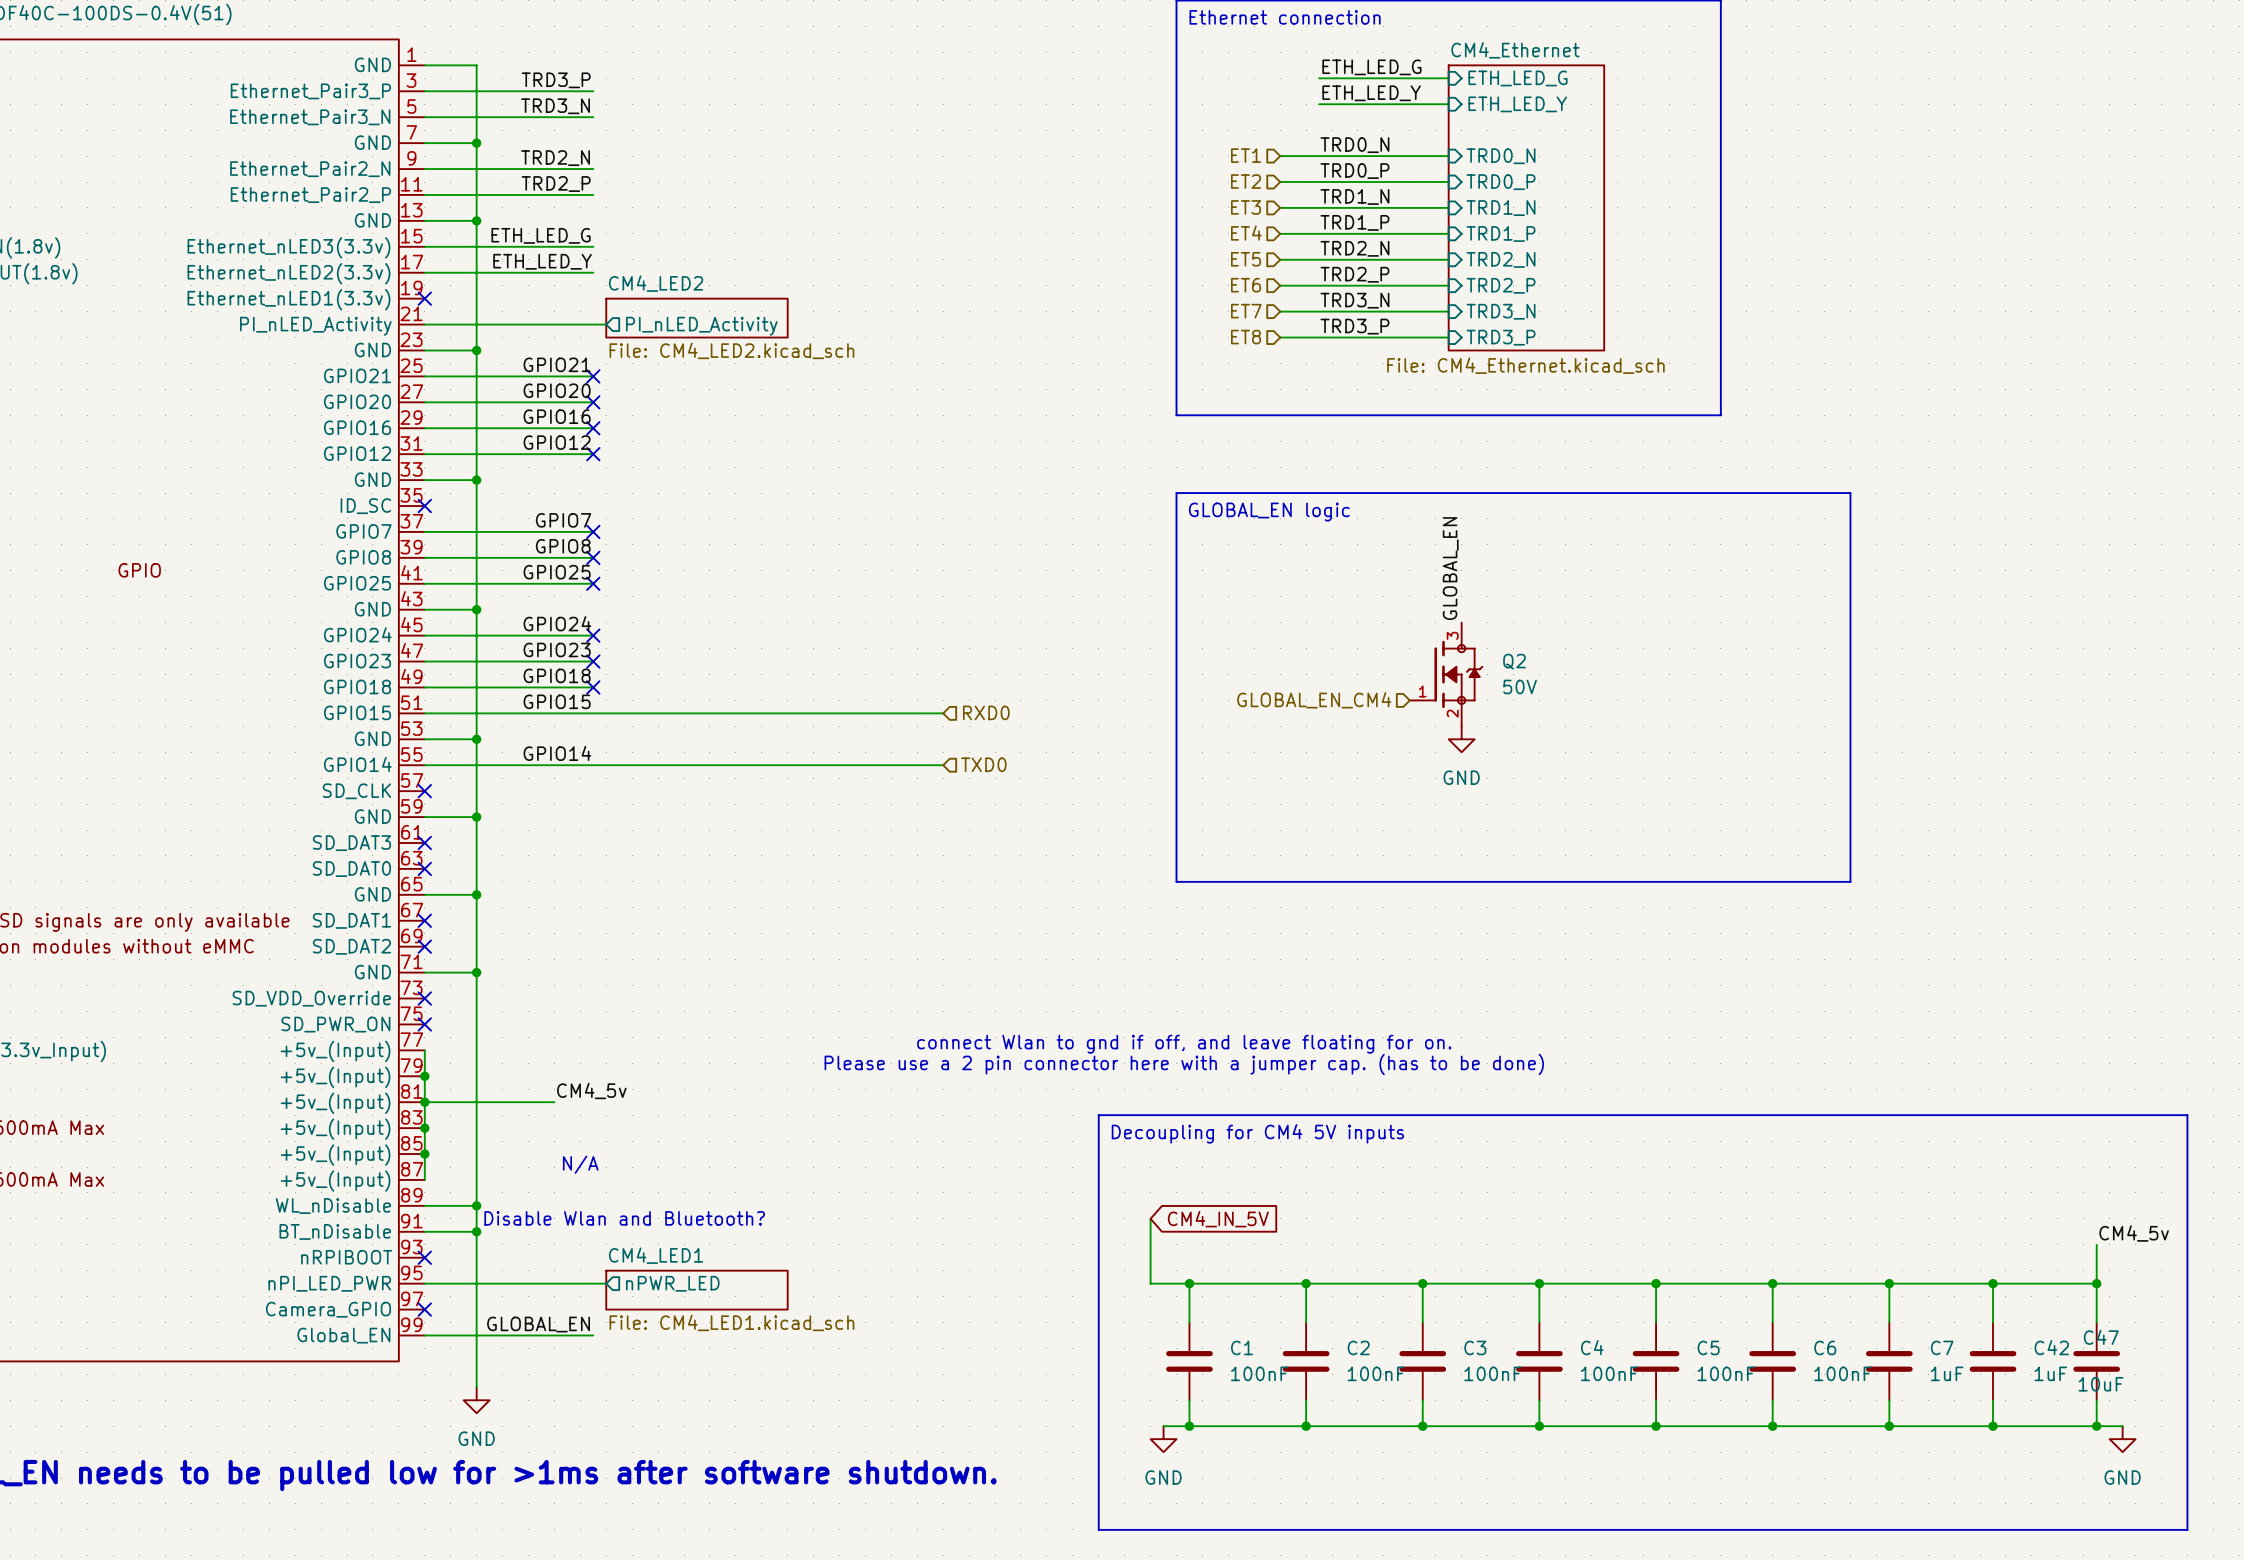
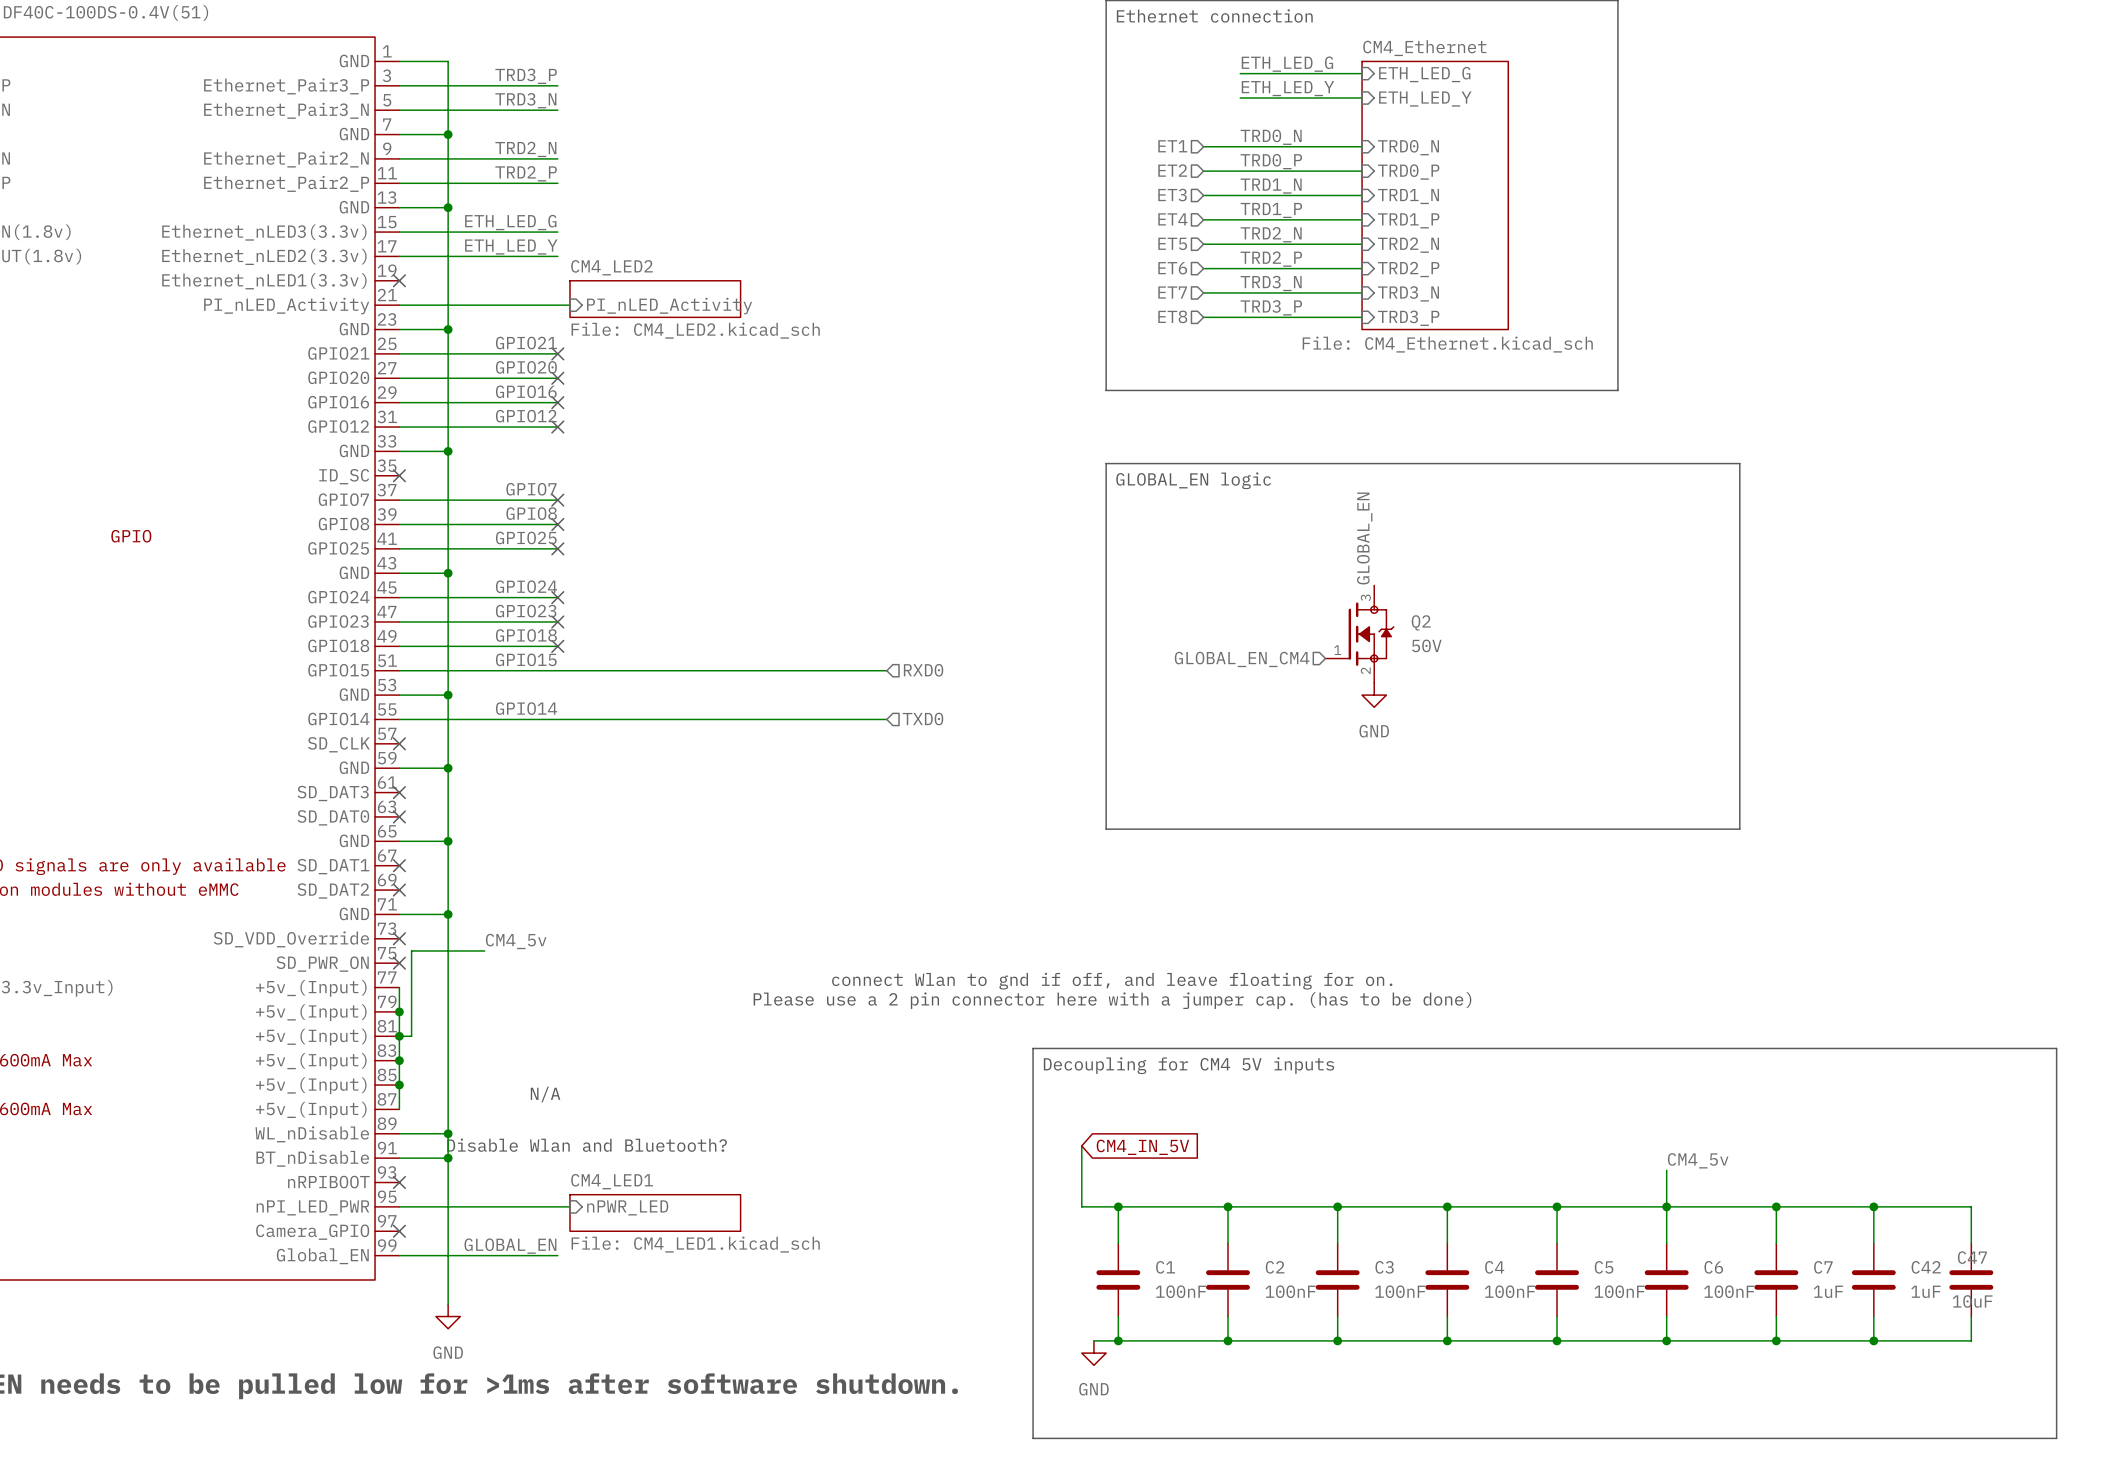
sheet pin shape: output (701, 326) -> input (669, 306)
label position: CM4_5v (591, 1090) -> CM4_5v (516, 941)
wire: (437, 1102) (554, 1102) -> (411, 1036) (411, 950) (484, 950)
label: none -> CM4_5v (1698, 1160)
label: CM4_5v (2134, 1233) -> none
wire: none -> (1666, 1170) (1666, 1206)
wire: (2096, 1244) (2096, 1283) -> none
sheet pin shape: output (672, 1283) -> input (627, 1207)
junction: (2096, 1283) -> none
wire: (2096, 1426) (2122, 1426) -> none
junction: (2096, 1426) -> none
power symbol: GND (2122, 1439) -> none

